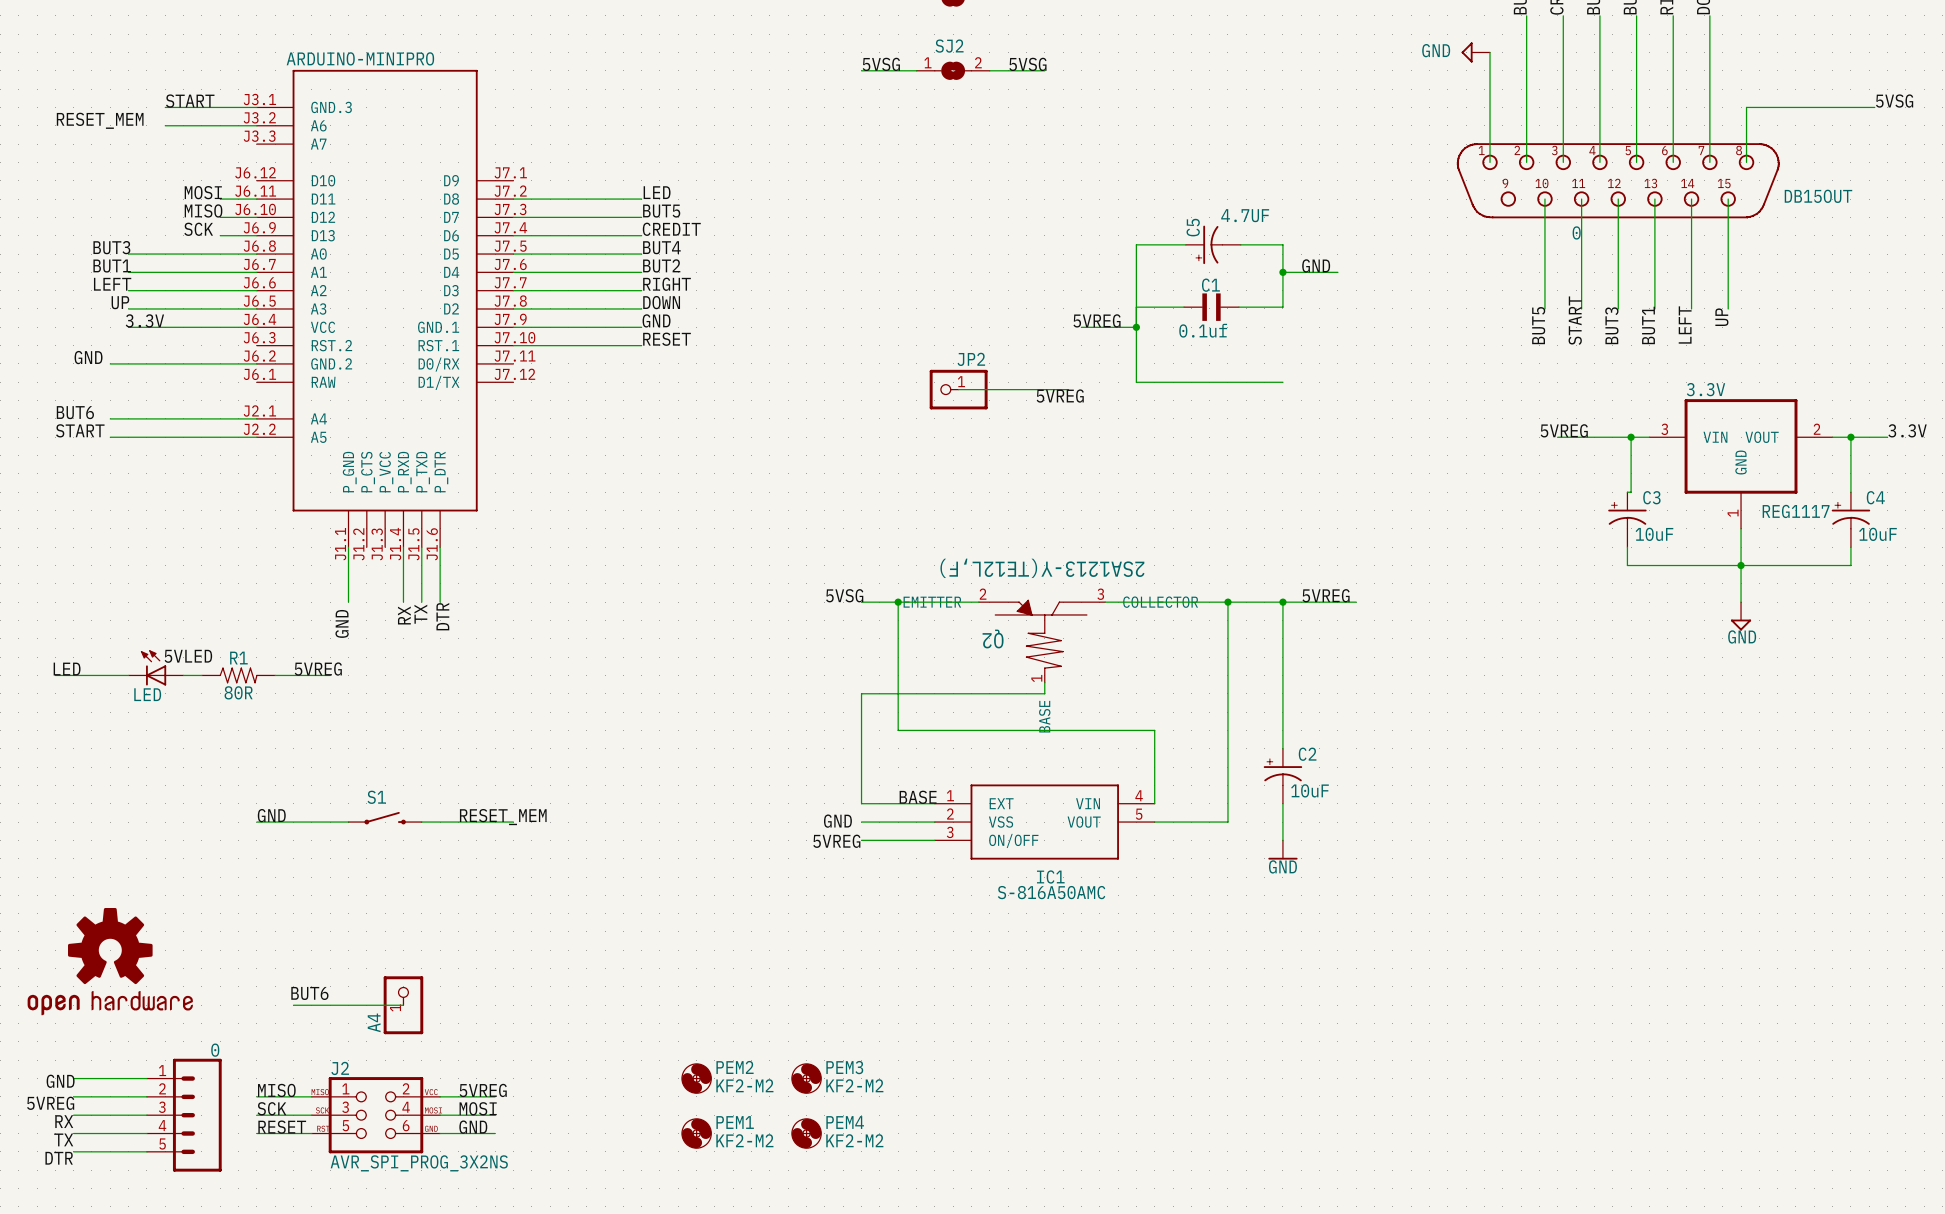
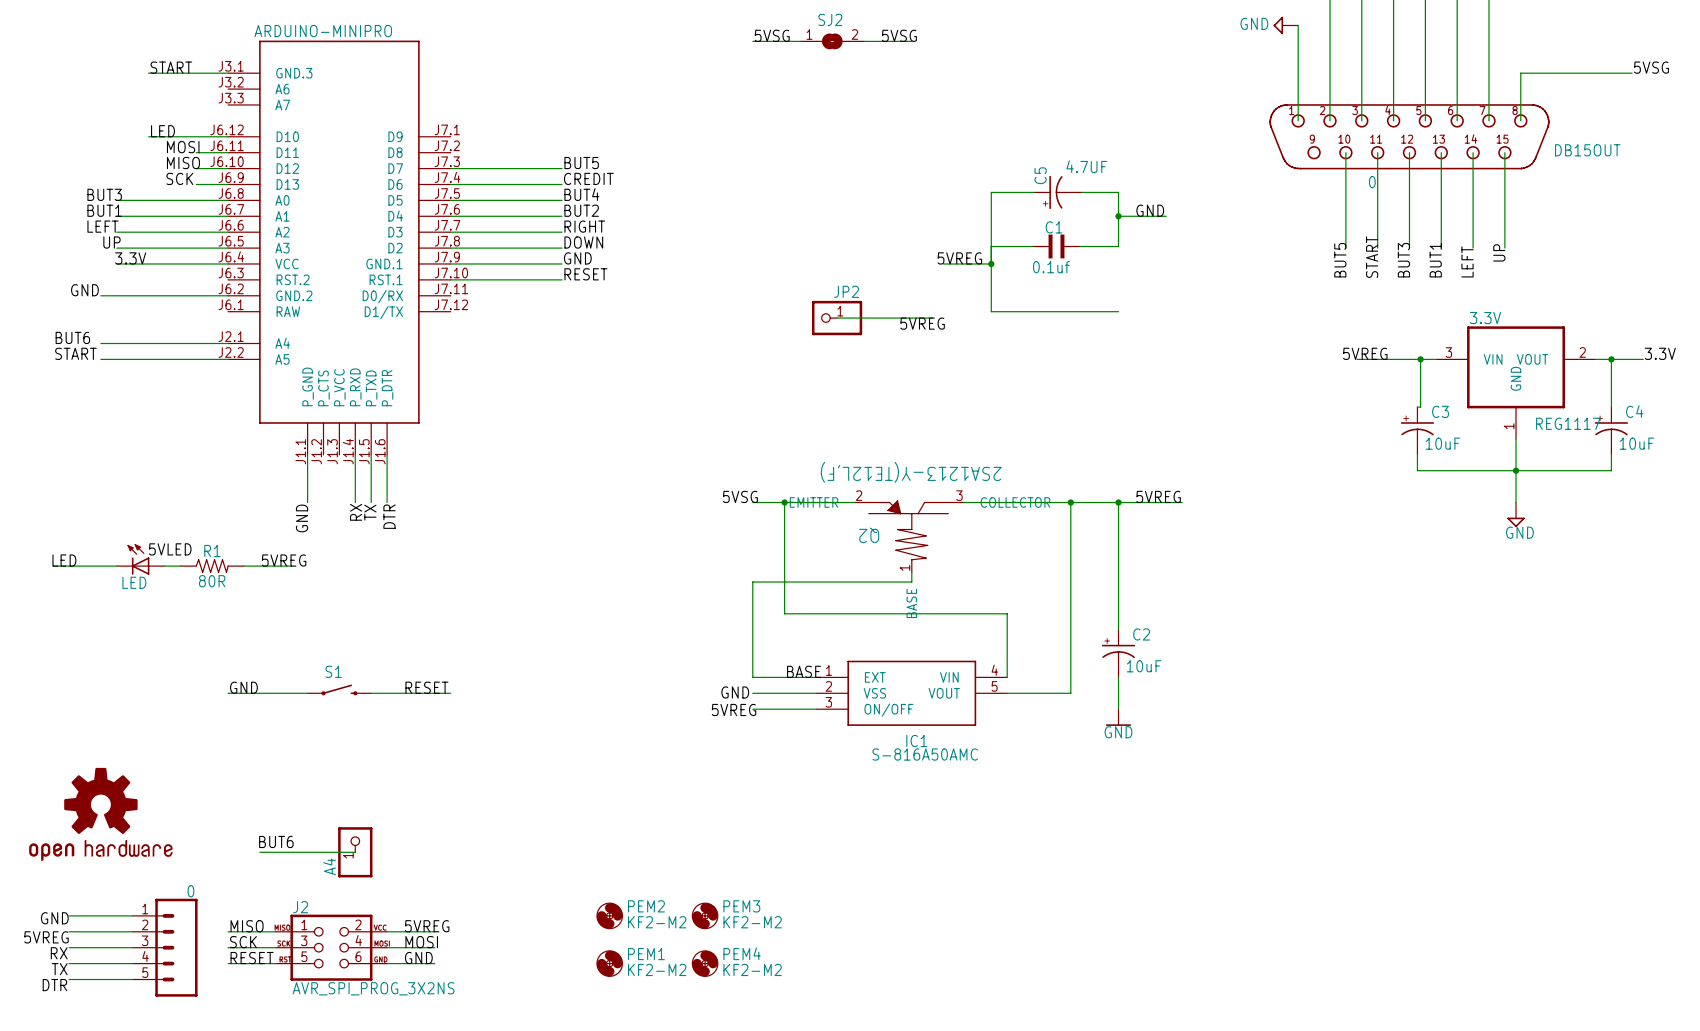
label: RESET_MEM (100, 120) -> none
wire: (165, 125) (256, 125) -> (148, 136) (228, 136)
label: none -> LED (163, 131)
label: LED (657, 192) -> none
wire: (513, 199) (641, 199) -> none
label: RESET_MEM (503, 817) -> RESET (426, 687)

